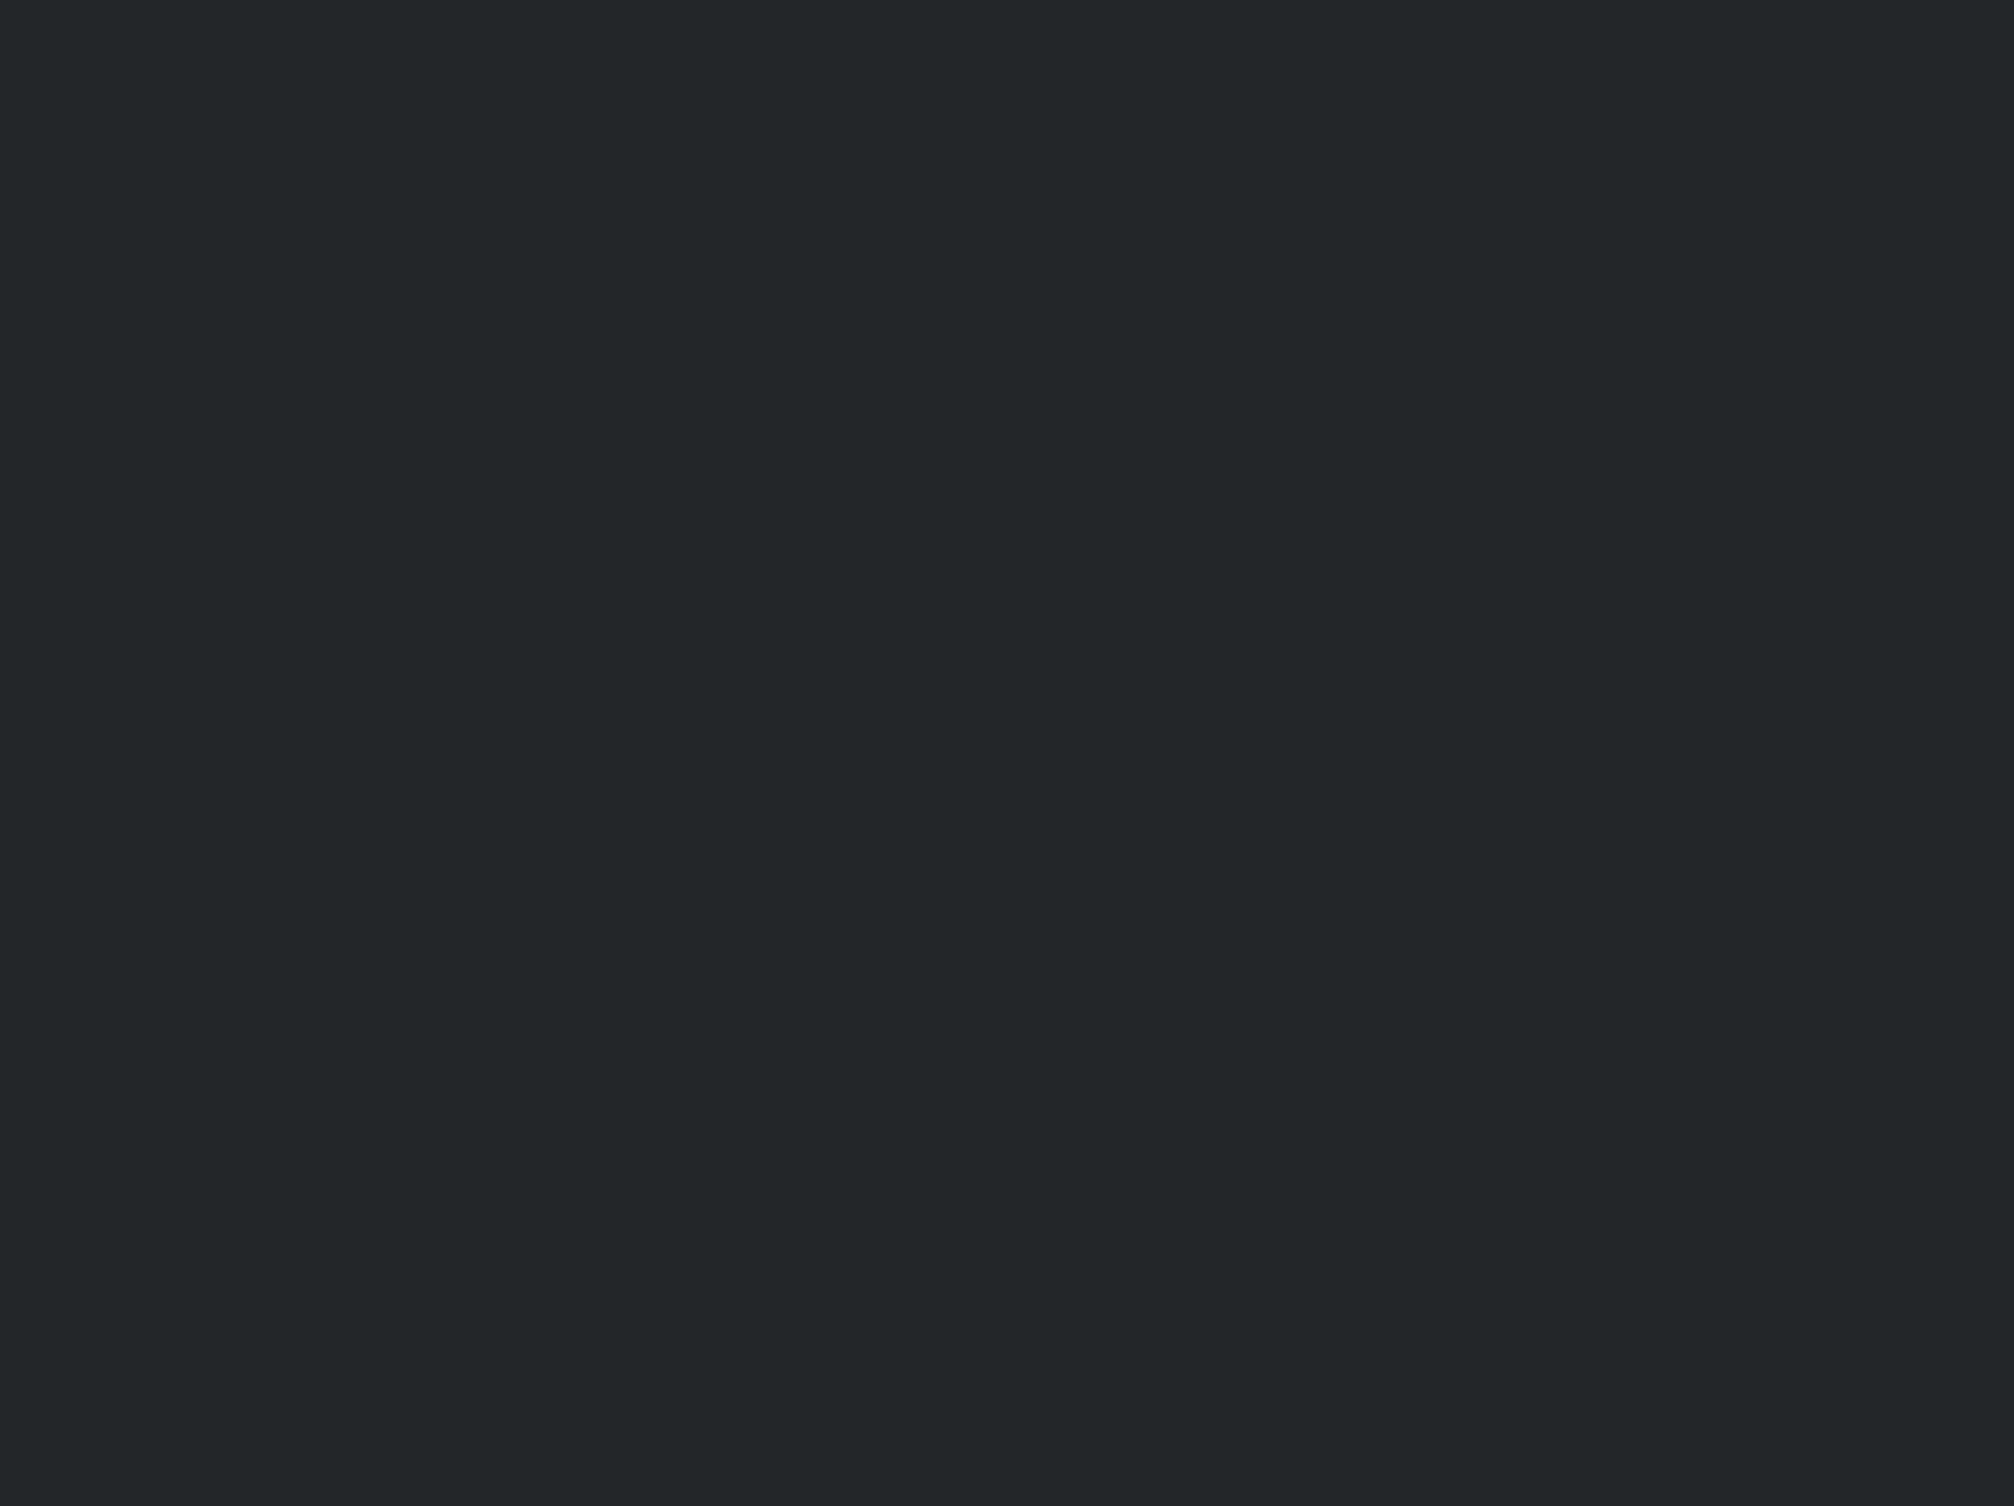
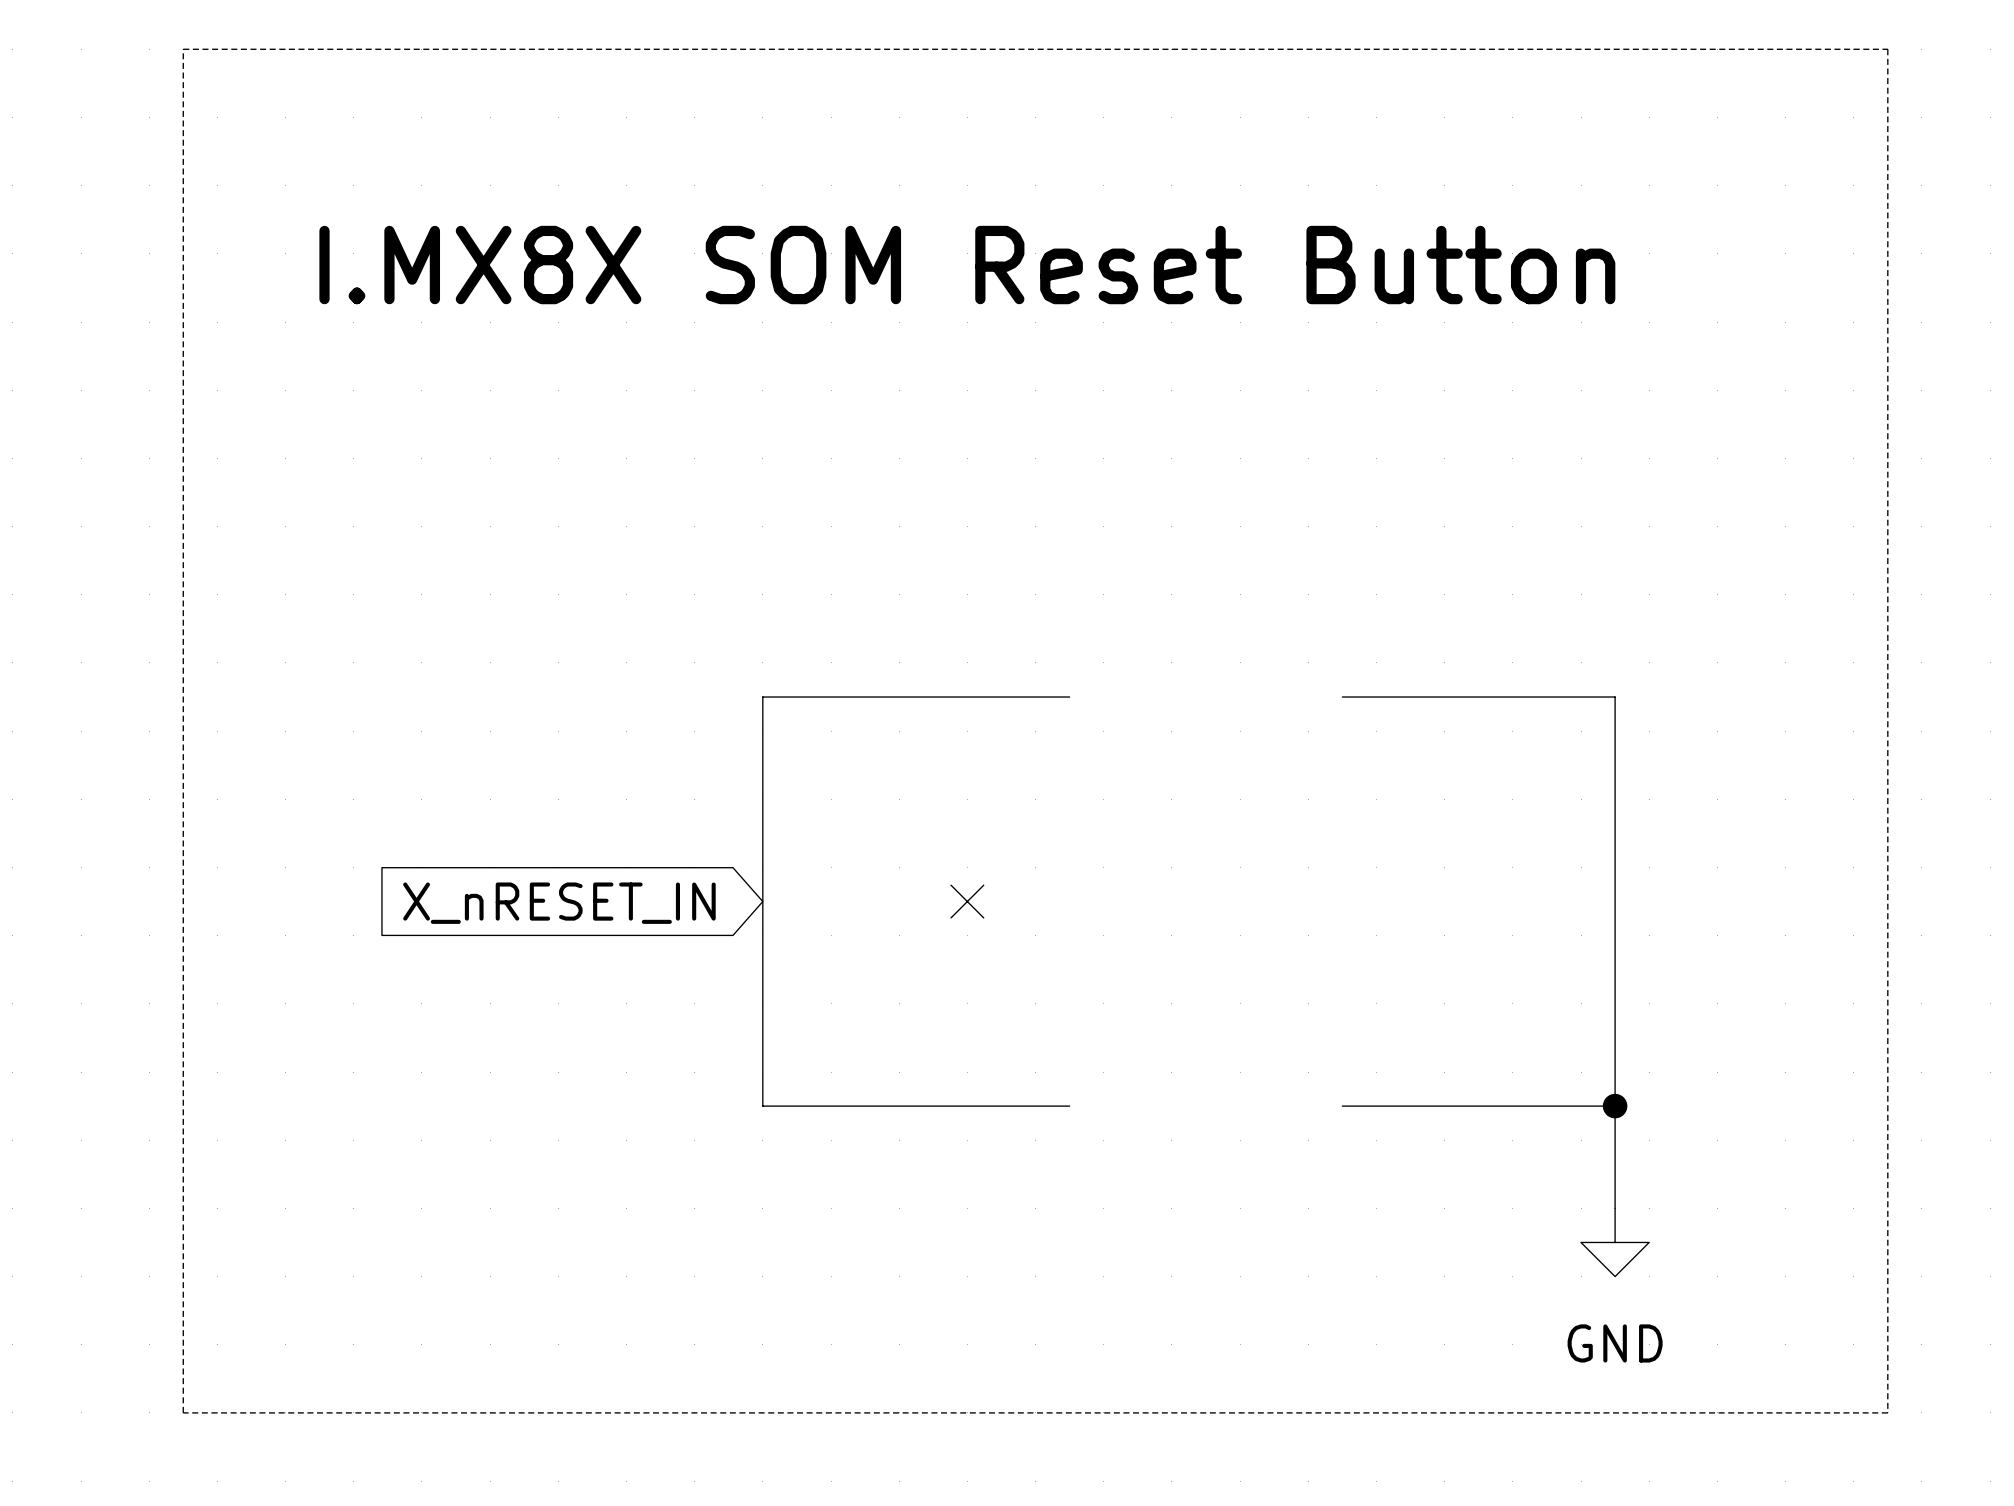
line: none -> (183, 49) (1887, 49) (1887, 1412) (183, 1412) (183, 49)
text: none -> I.MX8X SOM Reset Button (967, 265)
wire: none -> (1069, 697) (762, 697) (762, 1106) (1069, 1106)
wire: none -> (1342, 697) (1615, 697) (1615, 1208)
no-connect mark: none -> (967, 901)
global label: none -> X_nRESET_IN (559, 903)
wire: none -> (1342, 1106) (1615, 1106)
junction: none -> (1615, 1106)
power symbol: none -> GND (1615, 1242)

